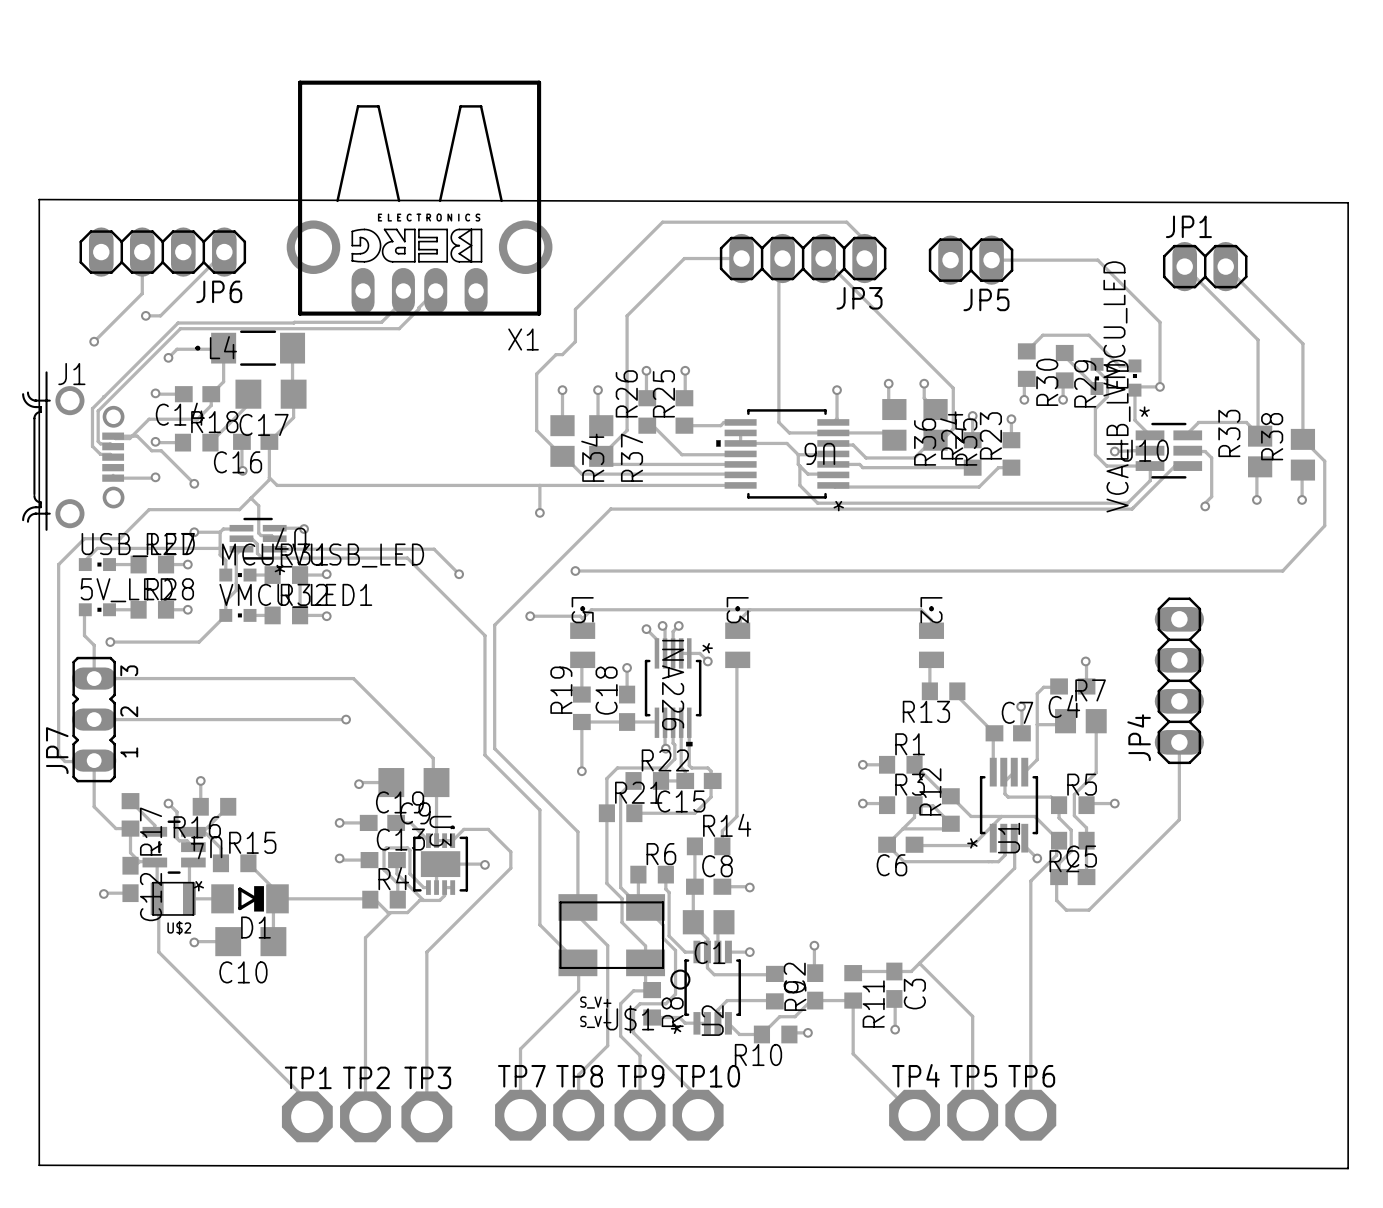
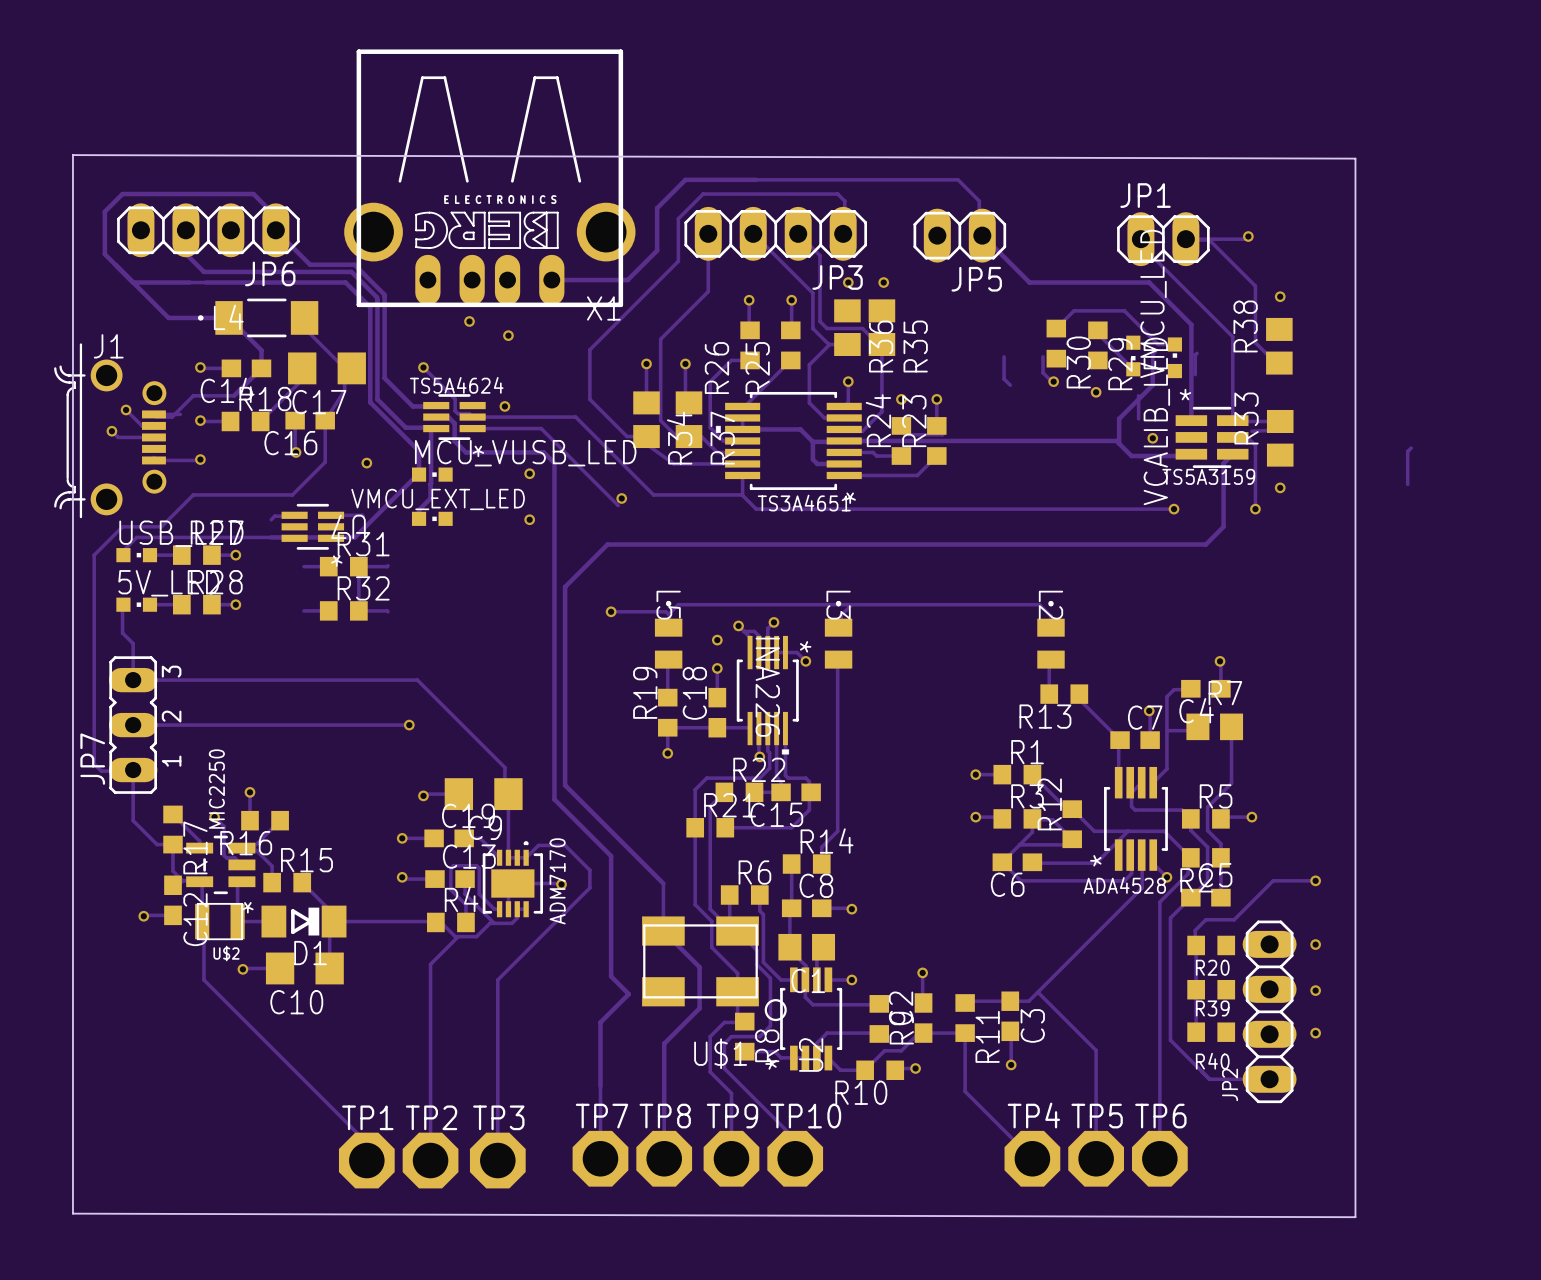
X1 position: (419, 198) -> (489, 178)
board edge: (39, 199) (1348, 202) (1348, 1168) (39, 1165) -> (72, 155) (1355, 158) (1355, 1217) (72, 1213)
track: (662, 222) (575, 309) (575, 341) (562, 354) (556, 354) (536, 373) (536, 430) (581, 474) (740, 474) -> (756, 179) (685, 179) (657, 208) (657, 250) (627, 280) (551, 280)
JP6 position: (162, 252) -> (208, 230)
track: (224, 252) (160, 315) -> (419, 474) (419, 451) (370, 402) (370, 307) (345, 282) (205, 282)
track: (741, 258) (684, 258) (627, 315) (627, 430) (601, 456) (609, 464) (740, 464) -> none
track: (782, 258) (778, 262) (778, 422) (789, 432) (887, 432) (894, 440) -> none
JP3 position: (803, 258) -> (775, 233)
track: (823, 258) (953, 388) (953, 428) (941, 440) (932, 440) (914, 457) (866, 457) (853, 445) (833, 443) -> none
JP5 position: (971, 260) -> (959, 235)
track: (991, 260) (1097, 260) (1160, 322) (1160, 386) (1138, 386) (1134, 390) (1134, 420) (1150, 435) -> none
track: (1184, 266) (1258, 339) (1258, 434) -> none
JP1 position: (1205, 266) -> (1163, 239)
track: (1225, 266) (1302, 343) (1302, 439) (1324, 461) (1324, 525) (1282, 571) (575, 571) -> none
track: none -> (708, 233) (708, 291) (660, 339) (660, 420) (674, 434) (701, 436) (717, 452) (742, 452)
track: none -> (753, 233) (812, 293) (812, 328) (828, 344) (847, 344)
track: none -> (798, 233) (819, 255) (819, 321) (827, 328) (862, 328) (878, 344) (881, 344) (881, 411) (862, 431) (846, 431) (844, 429)
track: none -> (843, 233) (844, 232) (844, 201) (837, 194) (703, 194) (678, 218) (678, 261) (589, 349) (589, 399) (627, 436) (635, 436) (673, 463) (742, 463)
track: none -> (982, 235) (1029, 282) (1149, 282) (1191, 324) (1191, 420)
track: none -> (1248, 236) (1245, 239) (1185, 239) (1209, 240) (1255, 286) (1255, 342) (1275, 363) (1279, 363)
via: none -> (1248, 236)
track: none -> (1140, 239) (1140, 244) (1232, 336) (1232, 420) (1280, 421)
track: (142, 289) (142, 293) (94, 341) -> (185, 253) (203, 271) (351, 271) (377, 297) (377, 399) (405, 427) (436, 428)
track: (403, 290) (403, 300) (381, 322) (178, 323) (92, 408) (92, 446) (100, 454) (110, 454) (113, 457) -> (111, 431) (118, 437) (153, 437)
track: (435, 290) (399, 328) (180, 328) (98, 410) (98, 441) (100, 443) (110, 443) (113, 446) -> (126, 409) (142, 425) (153, 425)
track: none -> (133, 282) (189, 282)
via: (145, 315) -> none
via: none -> (848, 282)
via: none -> (883, 282)
via: none -> (1280, 296)
track: none -> (384, 297) (384, 378) (412, 406) (436, 405)
via: none -> (749, 300)
via: none -> (791, 300)
via: (94, 341) -> none
track: (223, 348) (223, 381) (211, 394) (211, 405) (197, 419) (186, 419) -> (384, 296) (354, 264) (310, 264) (275, 230) (275, 216) (253, 194) (122, 194) (104, 211) (104, 254) (168, 317) (229, 317) (261, 350) (261, 368) (234, 395)
track: none -> (304, 317) (304, 328) (344, 368)
L4 position: (250, 348) -> (258, 317)
track: (294, 348) (292, 348) (293, 417) (269, 441) -> (344, 368) (344, 390) (325, 420)
track: (223, 349) (177, 349) (168, 357) -> none
via: none -> (469, 321)
track: (1026, 351) (1042, 335) (1088, 335) (1119, 365) (1134, 365) -> (1056, 328) (1074, 310) (1124, 310) (1158, 344) (1174, 344)
track: (1064, 353) (1064, 356) (1097, 388) -> (1097, 330) (1097, 333) (1133, 369)
via: (168, 357) -> none
via: none -> (508, 335)
track: (1097, 364) (1097, 369) (1107, 380) (1107, 396) (1095, 408) (1095, 454) (1106, 466) (1150, 466) (1150, 480) (1127, 503) (817, 503) (799, 485) (799, 466) -> none
R30 position: (1026, 365) -> (1056, 343)
R29 position: (1064, 366) -> (1097, 345)
track: (646, 370) (647, 398) -> (749, 300) (750, 330)
via: (646, 370) -> none
track: (685, 370) (684, 398) -> (791, 300) (790, 330)
via: (685, 370) -> none
track: none -> (829, 344) (809, 364) (809, 402) (824, 417) (844, 417)
VCALIB_LED position: (1097, 376) -> (1133, 355)
VMCU_LED position: (1134, 378) -> (1174, 357)
via: (888, 383) -> none
via position: (924, 383) -> (1053, 381)
track: none -> (756, 360) (731, 360) (710, 381) (710, 427) (723, 440) (741, 441)
track: none -> (790, 360) (742, 406)
via: (1160, 386) -> none
track: (837, 390) (837, 418) (833, 422) -> none
via: (837, 390) -> none
track: none -> (423, 367) (455, 399) (455, 411) (457, 413) (469, 413) (472, 417) (575, 417) (653, 494) (742, 494) (756, 509) (1174, 509)
via: none -> (423, 367)
track: none -> (1152, 374) (1152, 385) (1119, 418) (1119, 443)
via: (1024, 399) -> none
via: (1063, 399) -> none
track: none -> (848, 381) (848, 402) (844, 406)
via: none -> (848, 381)
R26 position: (647, 411) -> (750, 345)
R25 position: (684, 411) -> (790, 345)
track: (972, 415) (972, 440) -> (936, 399) (936, 425)
via: (1011, 419) -> none
track: (740, 422) (723, 422) (720, 425) (684, 425) -> none
via: none -> (901, 399)
via: none -> (936, 399)
R36 position: (894, 424) -> (847, 327)
R35 position: (935, 424) -> (881, 327)
track: (647, 425) (652, 425) (681, 454) (740, 453) -> none
via: none -> (504, 406)
via: none -> (126, 409)
track: (740, 432) (740, 443) (786, 443) (798, 454) (798, 464) (807, 474) (833, 474) -> none
track: (1187, 435) (1198, 422) (1246, 422) (1260, 436) -> none
track: (137, 436) (151, 450) (161, 450) (194, 483) -> none
TS5A4624: none -> (454, 417)
track: none -> (742, 417) (742, 429) (800, 429) (812, 441)
track: none -> (432, 427) (430, 498) (419, 510) (419, 518)
track: none -> (472, 428) (541, 428) (618, 505)
U10: (1168, 450) -> none
track: (1187, 450) (1205, 451) (1211, 457) (1211, 496) (1205, 503) (1205, 506) -> none
via: none -> (111, 431)
via: (1114, 451) -> none
R33 position: (1260, 451) -> (1280, 438)
U6: (782, 453) -> none
R24 position: (972, 453) -> (901, 440)
R23 position: (1011, 453) -> (936, 440)
R38 position: (1302, 454) -> (1279, 346)
via: none -> (1152, 438)
TS5A3159: none -> (1212, 437)
track: none -> (1232, 437) (1248, 438) (1255, 445) (1255, 509)
TS3A4651: none -> (788, 440)
track: none -> (812, 441) (1116, 440) (1131, 456) (1189, 456) (1191, 454)
track: none -> (812, 441) (812, 459) (817, 463) (844, 463)
track: (833, 464) (859, 464) (862, 467) (972, 467) -> none
track: (1187, 466) (1175, 466) (1132, 509) (610, 509) -> none
track: (1011, 467) (998, 467) (979, 487) (834, 487) (833, 485) -> none
track: none -> (844, 452) (873, 452) (876, 456) (901, 456)
track: (1302, 470) (1302, 499) -> none
track: none -> (936, 456) (917, 475) (844, 475)
track: (269, 477) (277, 485) (740, 485) -> none
via: none -> (366, 463)
via: (194, 483) -> none
track: (539, 485) (539, 512) -> none
track: none -> (419, 473) (354, 537) (271, 537)
via: none -> (529, 473)
track: none -> (742, 475) (742, 495)
track: (251, 498) (258, 505) (258, 533) (261, 535) (271, 535) (274, 538) -> none
via: (1256, 499) -> none
via: (1302, 499) -> none
via: none -> (1280, 487)
via: (1205, 506) -> none
track: (610, 508) (494, 625) (494, 748) (577, 831) (577, 864) -> (1232, 454) (1223, 463) (1223, 526) (1205, 544) (607, 544) (565, 587) (565, 785) (663, 883)
via: none -> (1174, 509)
via: none -> (1255, 509)
via: (304, 529) -> none
VMCU_EXT_LED: none -> (432, 518)
track: (194, 532) (220, 532) (220, 554) (225, 560) (225, 575) -> none
via: (194, 532) -> none
via: none -> (529, 519)
track: (241, 538) (251, 538) (257, 544) (257, 553) (262, 558) (407, 558) (484, 635) (484, 755) (539, 810) (539, 924) (578, 963) (578, 990) (520, 1049) -> (436, 417) (448, 417) (454, 423) (454, 441) (465, 452) (543, 452) (554, 463) (554, 799) (611, 856) (611, 976) (628, 994) (600, 1022) (600, 1086)
track: (241, 549) (236, 554) (236, 590) (225, 600) (225, 615) (199, 642) (110, 642) -> none
track: (274, 549) (434, 549) (459, 574) -> none
via: (575, 571) -> none
via: (326, 574) -> none
via: (459, 574) -> none
MCU_VUSB_LED position: (237, 575) -> (432, 474)
VMCU_LED1: (237, 615) -> none
via: (326, 616) -> none
track: (662, 625) (665, 628) (665, 638) -> (744, 631) (754, 631) (758, 635)
via position: (662, 625) -> (717, 640)
via: (110, 642) -> none
JP4: (1179, 680) -> none
track: (1179, 742) (1179, 819) (1088, 910) (1066, 910) (1056, 900) (1056, 876) (1059, 873) -> none
track: (581, 745) (581, 771) -> none
via position: (581, 771) -> (667, 753)
track: (1059, 815) (1071, 830) (1071, 851) (1059, 863) (1059, 877) -> (1190, 830) (1207, 847) (1207, 880) (1170, 918) (1170, 1040) (1209, 1079) (1269, 1079)
U3 name: U3 (440, 831) -> ADM7170 (557, 881)
U1 name: U1 (1009, 838) -> ADA4528 (1124, 885)
U4 name: U4 (206, 847) -> MIC2250 (216, 789)
track: none -> (1315, 880) (1273, 880) (1234, 919) (1205, 919) (1195, 930) (1196, 1032)
via: none -> (1315, 880)
track: (577, 907) (577, 915) (607, 945) (607, 1045) (578, 1074) -> (663, 931) (699, 967) (699, 1008) (664, 1043) (664, 1114)
via: none -> (1315, 944)
R20: none -> (1211, 945)
R39: none -> (1211, 989)
via: none -> (1315, 990)
JP2: none -> (1269, 1011)
R40: none -> (1211, 1032)
via: none -> (1315, 1033)
text: S_V+ (595, 1002) -> none
text: S_V- (595, 1021) -> none

